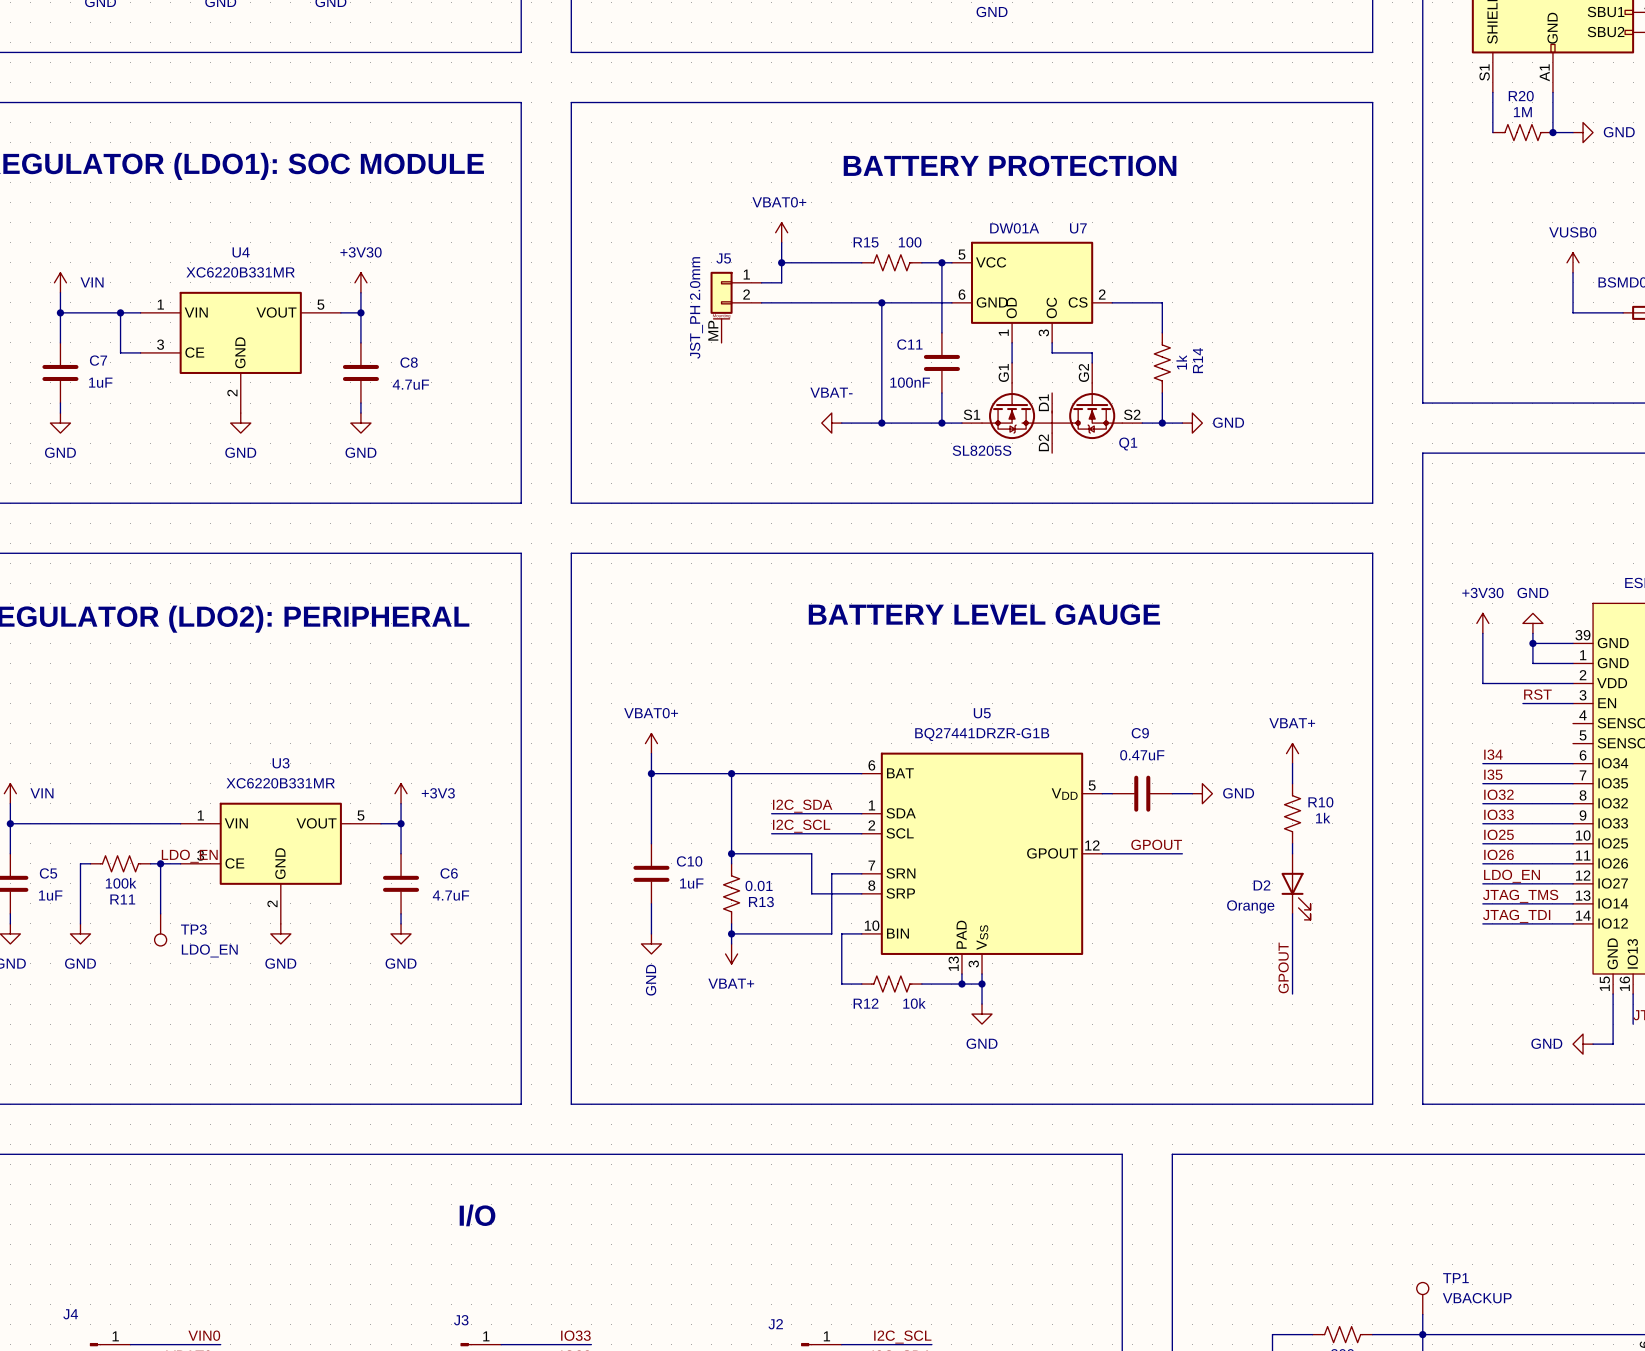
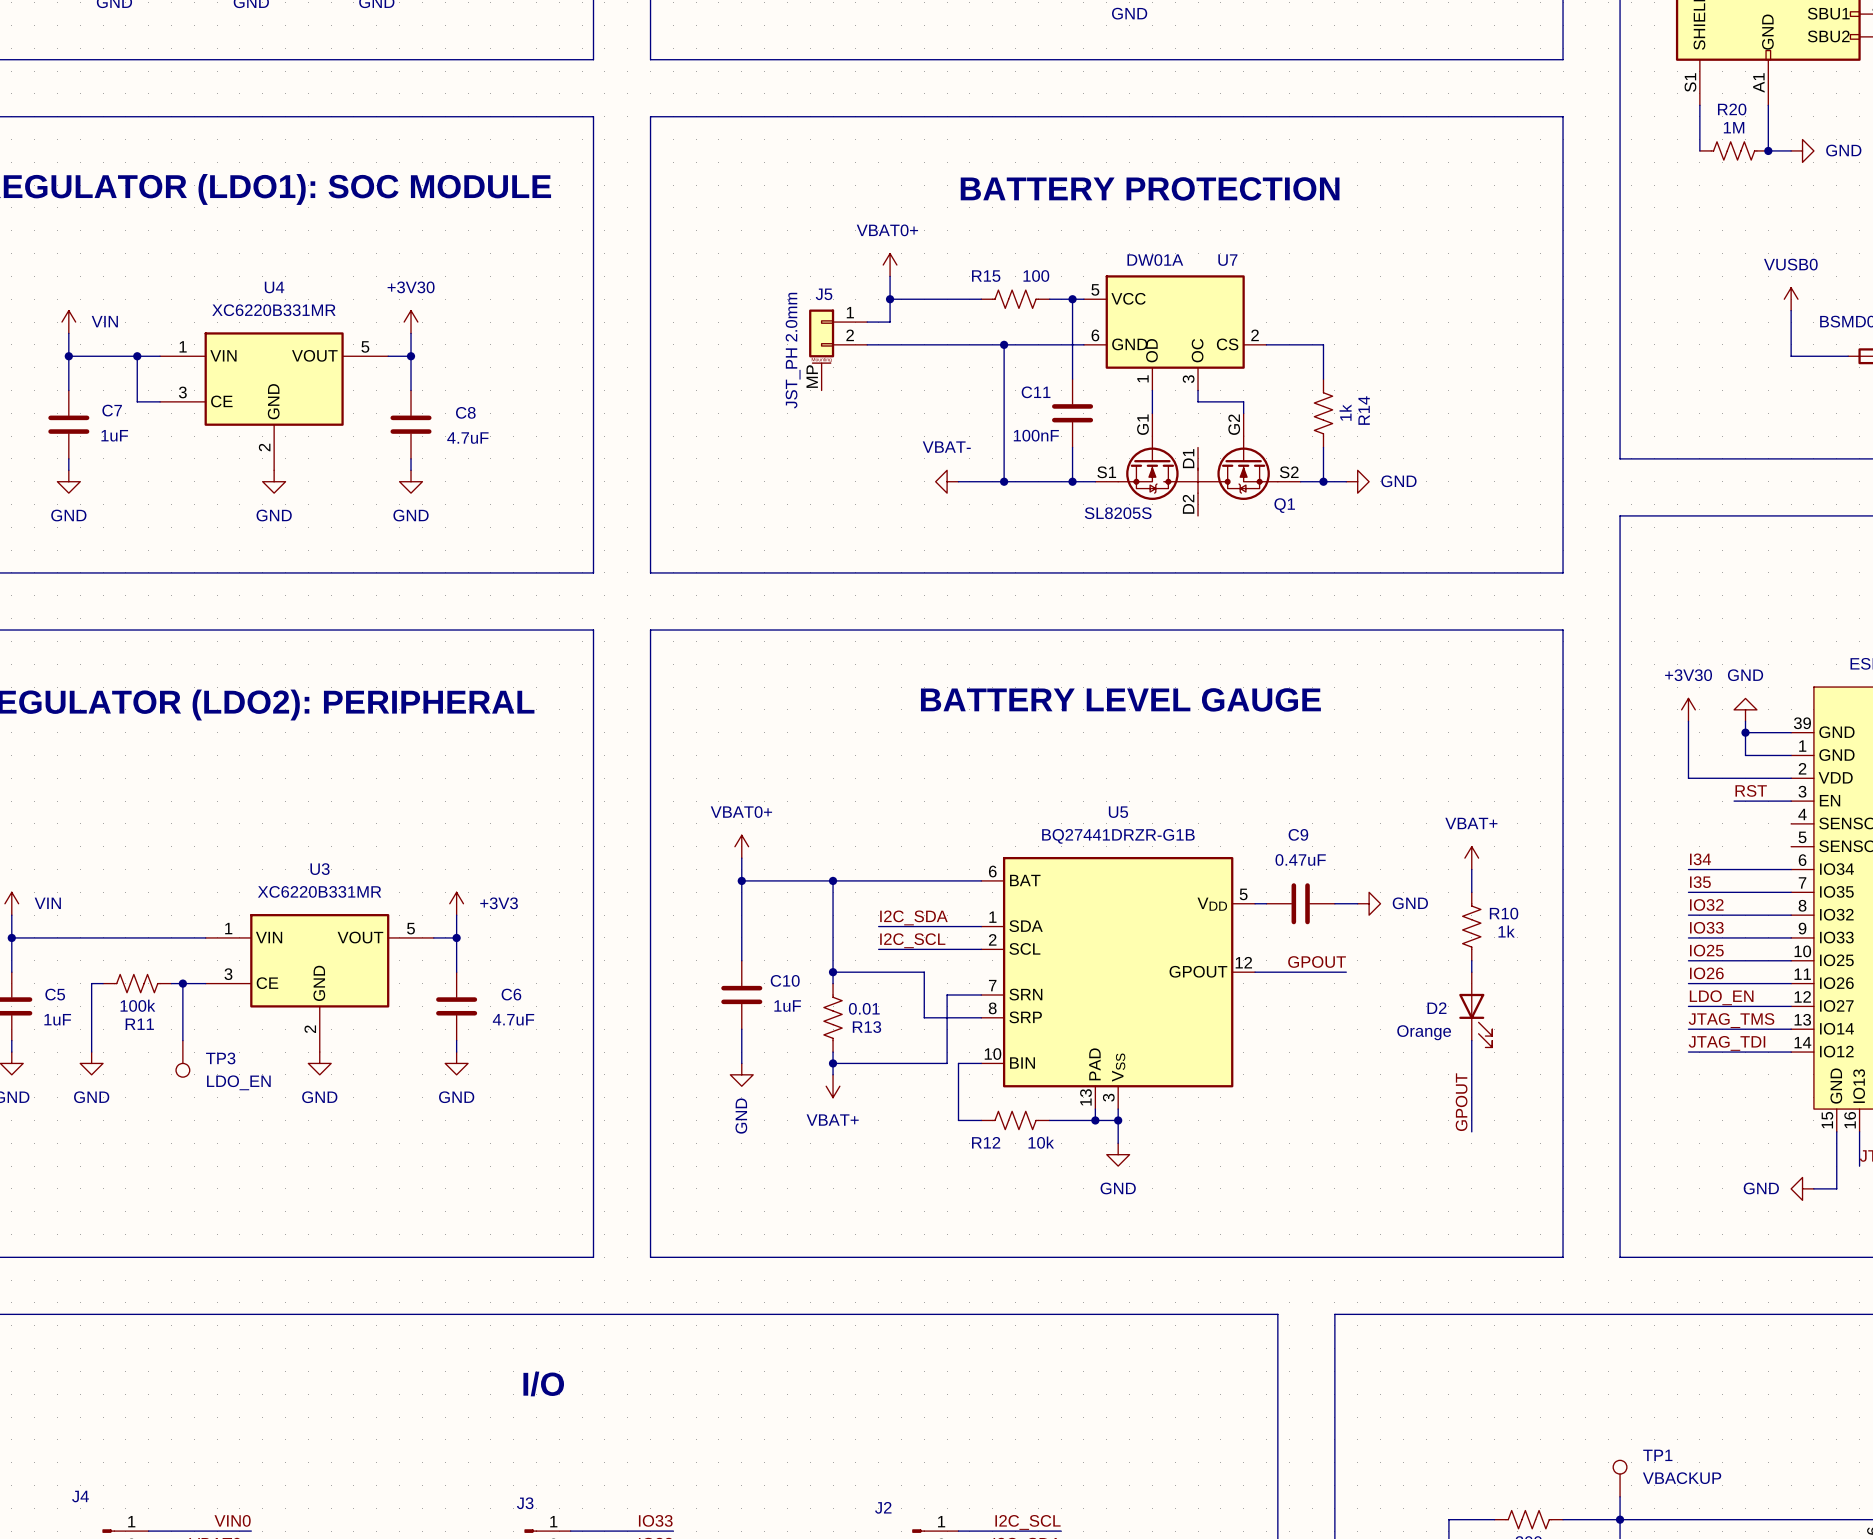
label: LDO_EN (189, 856) -> none

